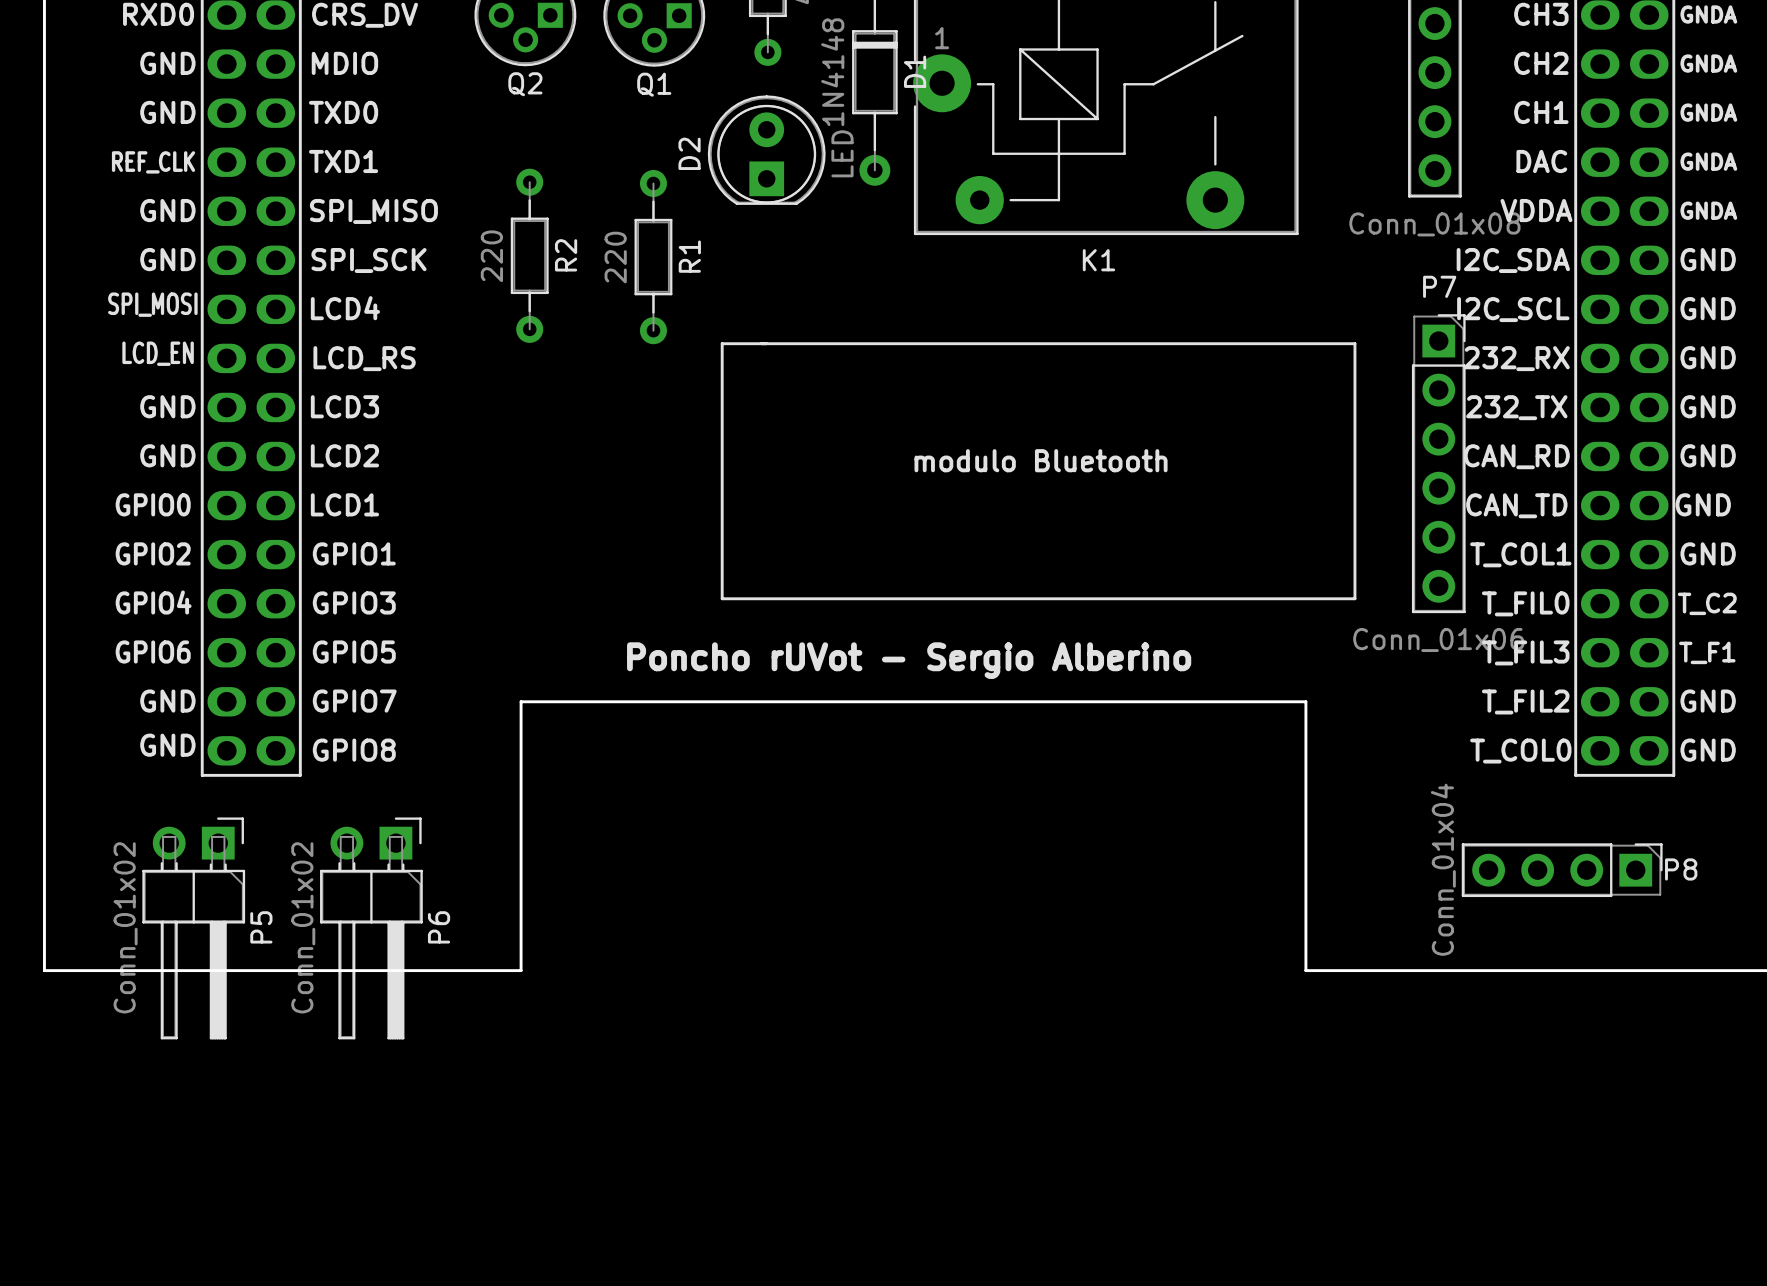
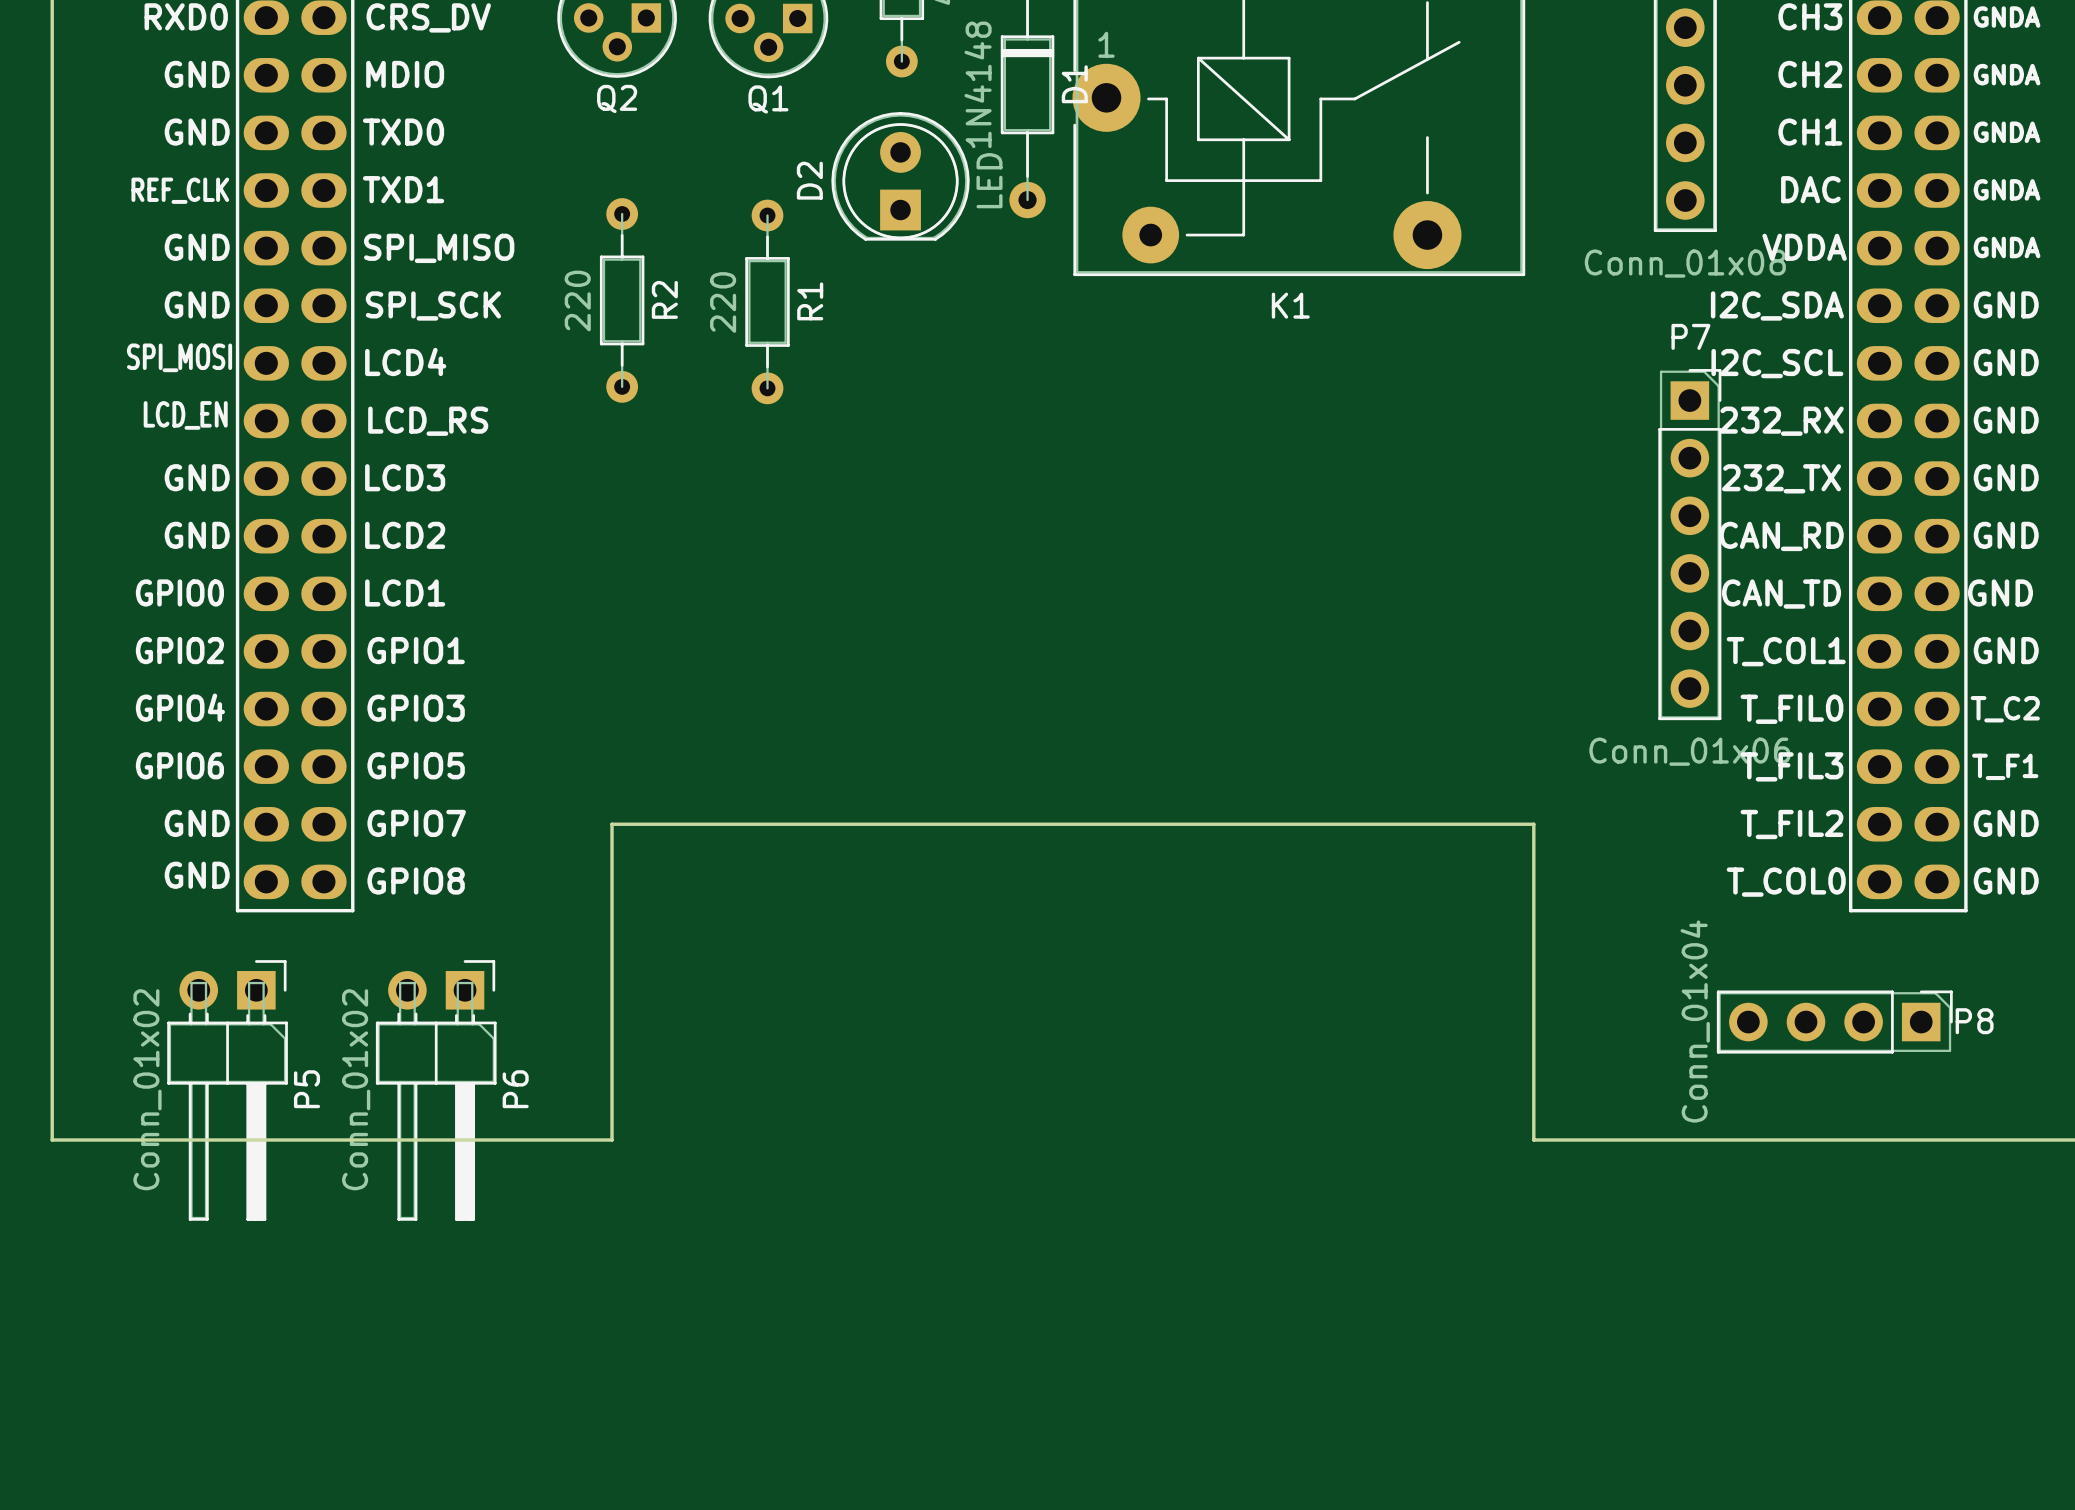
line: (722, 343) (1354, 343) (1354, 598) (722, 598) (722, 343) -> none
text: modulo Bluetooth (1041, 460) -> none
text: Poncho rUVot - Sergio Alberino (909, 660) -> none

